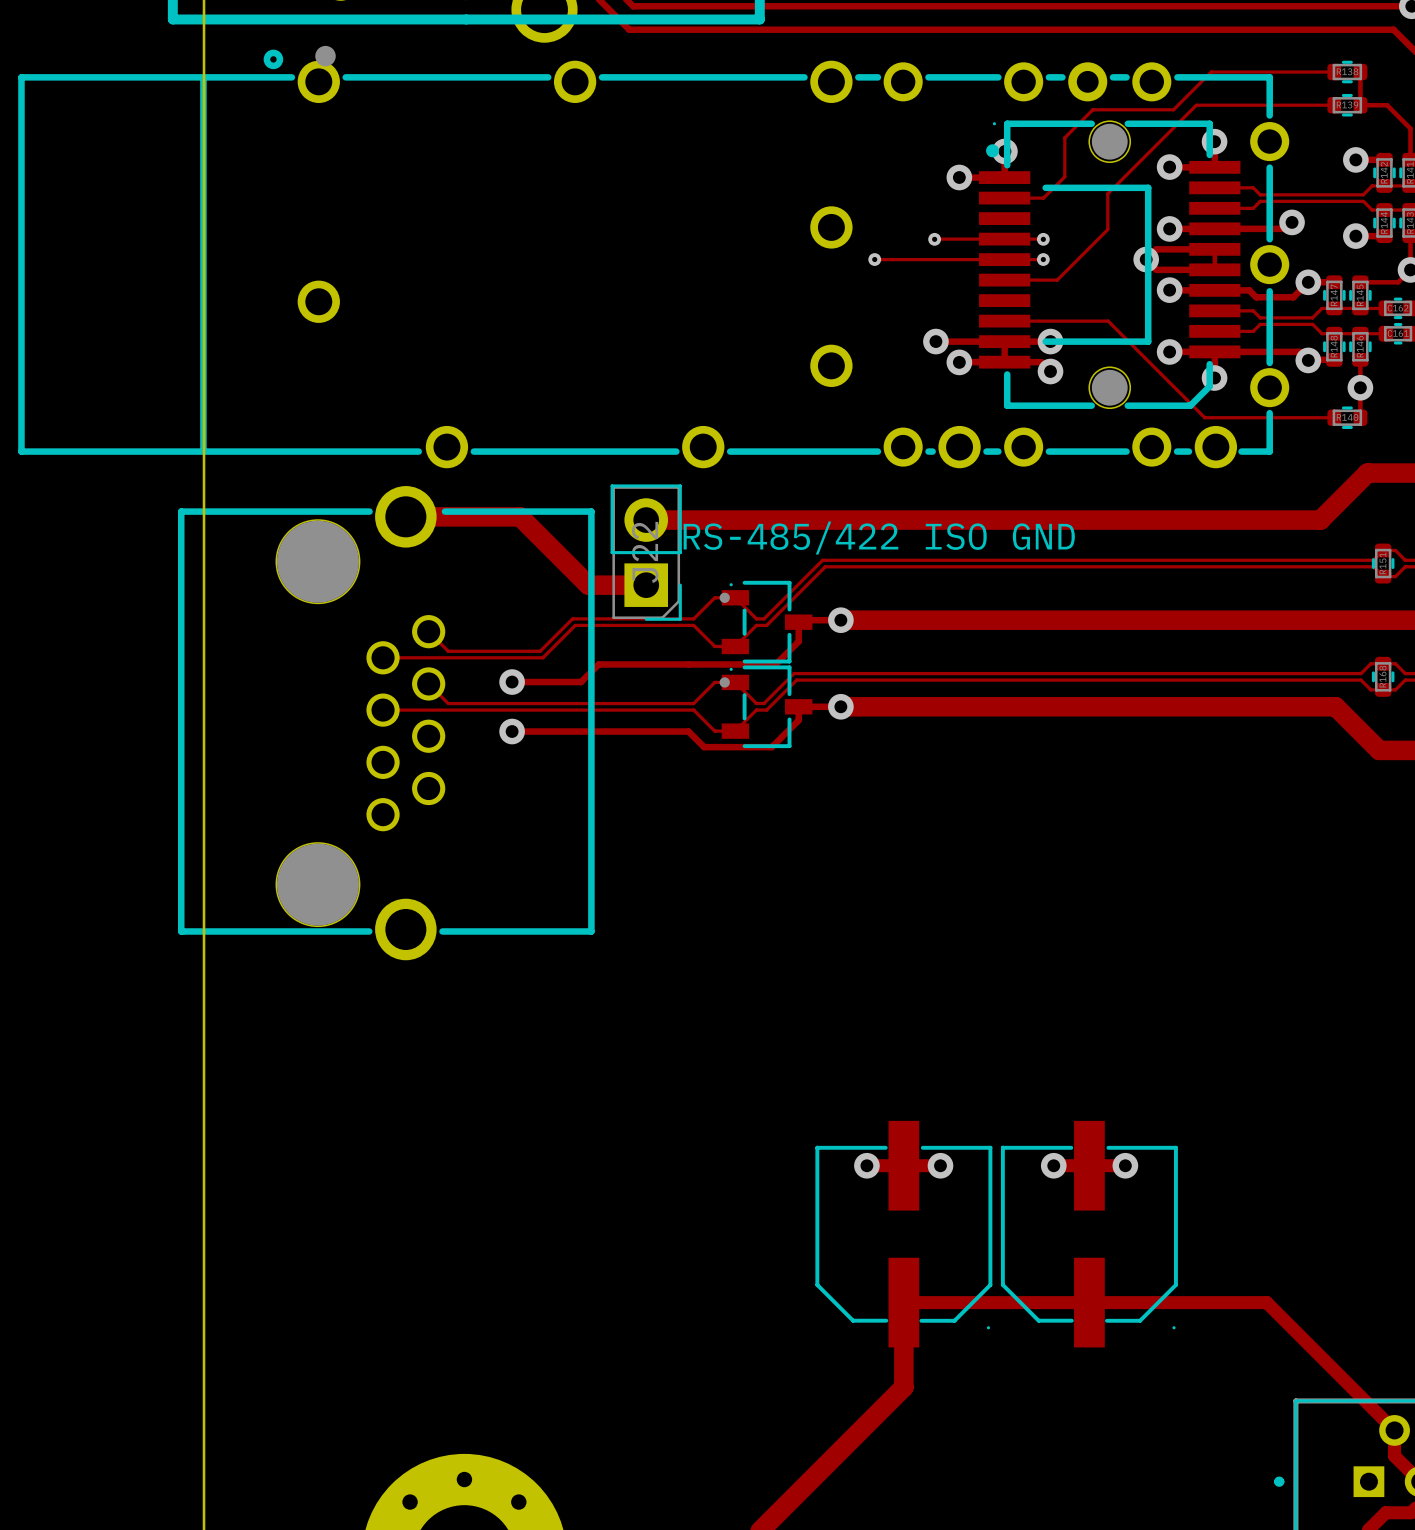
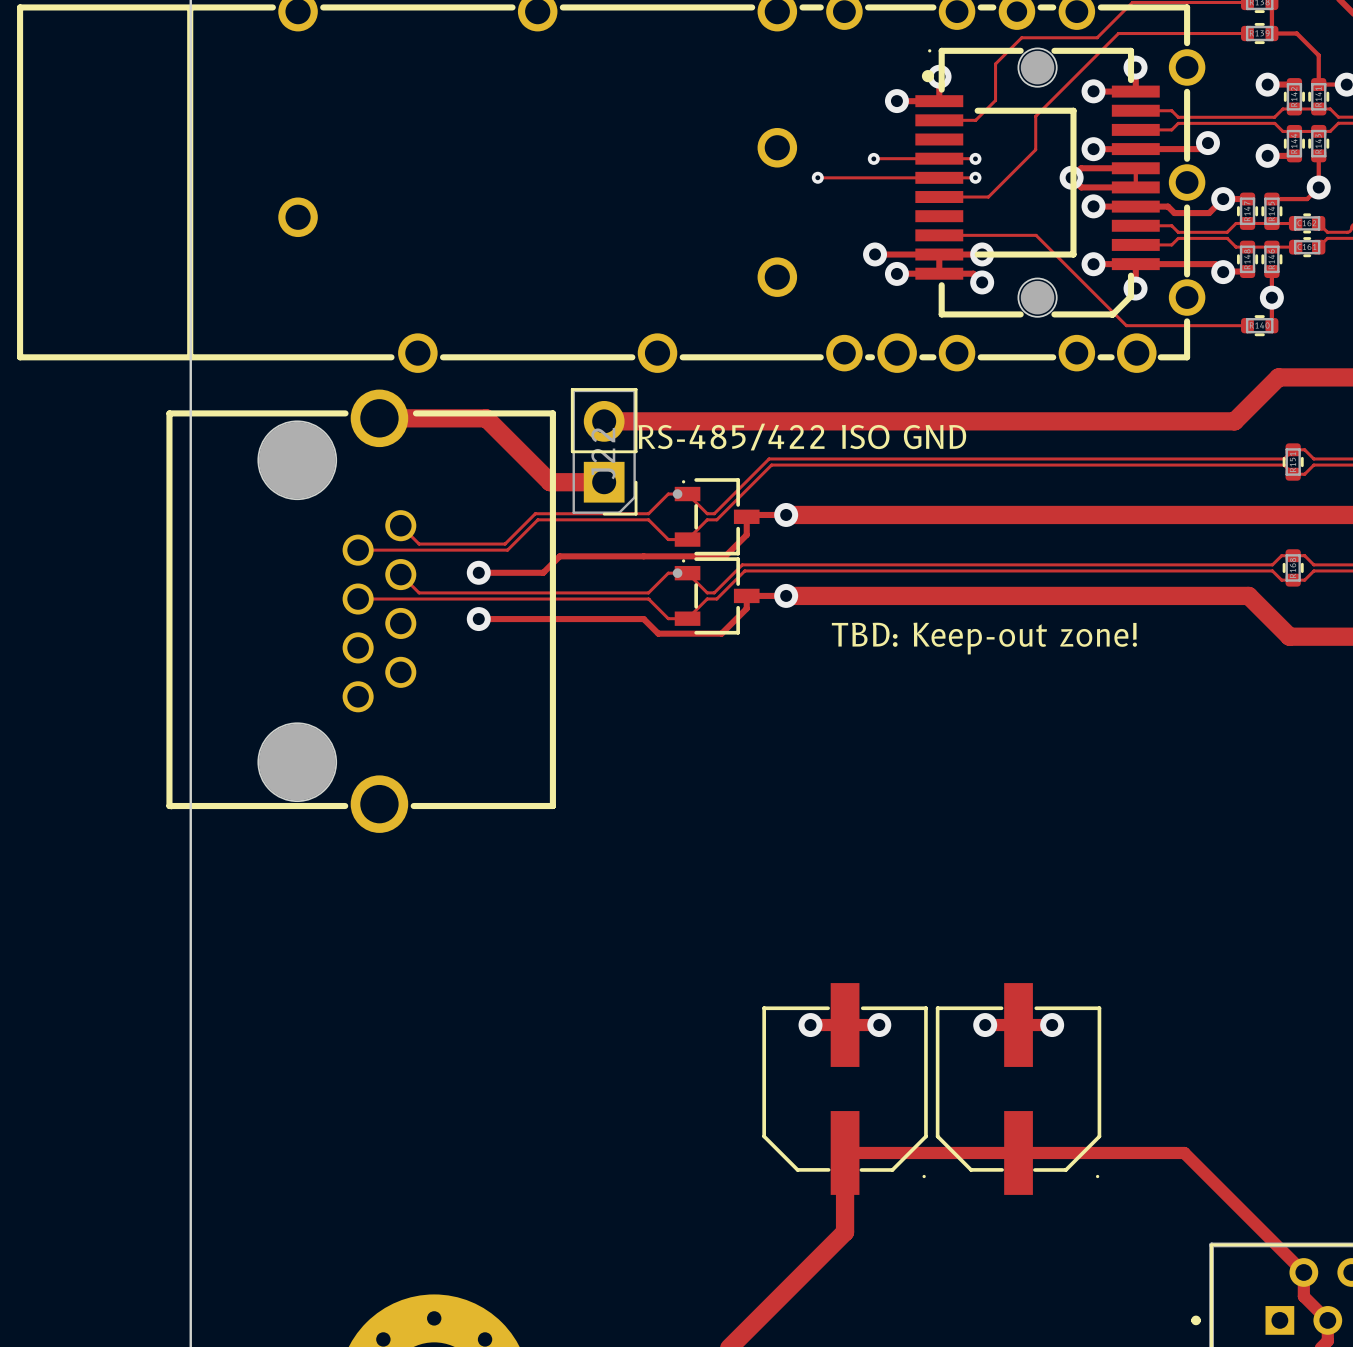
text: none -> TBD: Keep-out zone! (984, 638)

